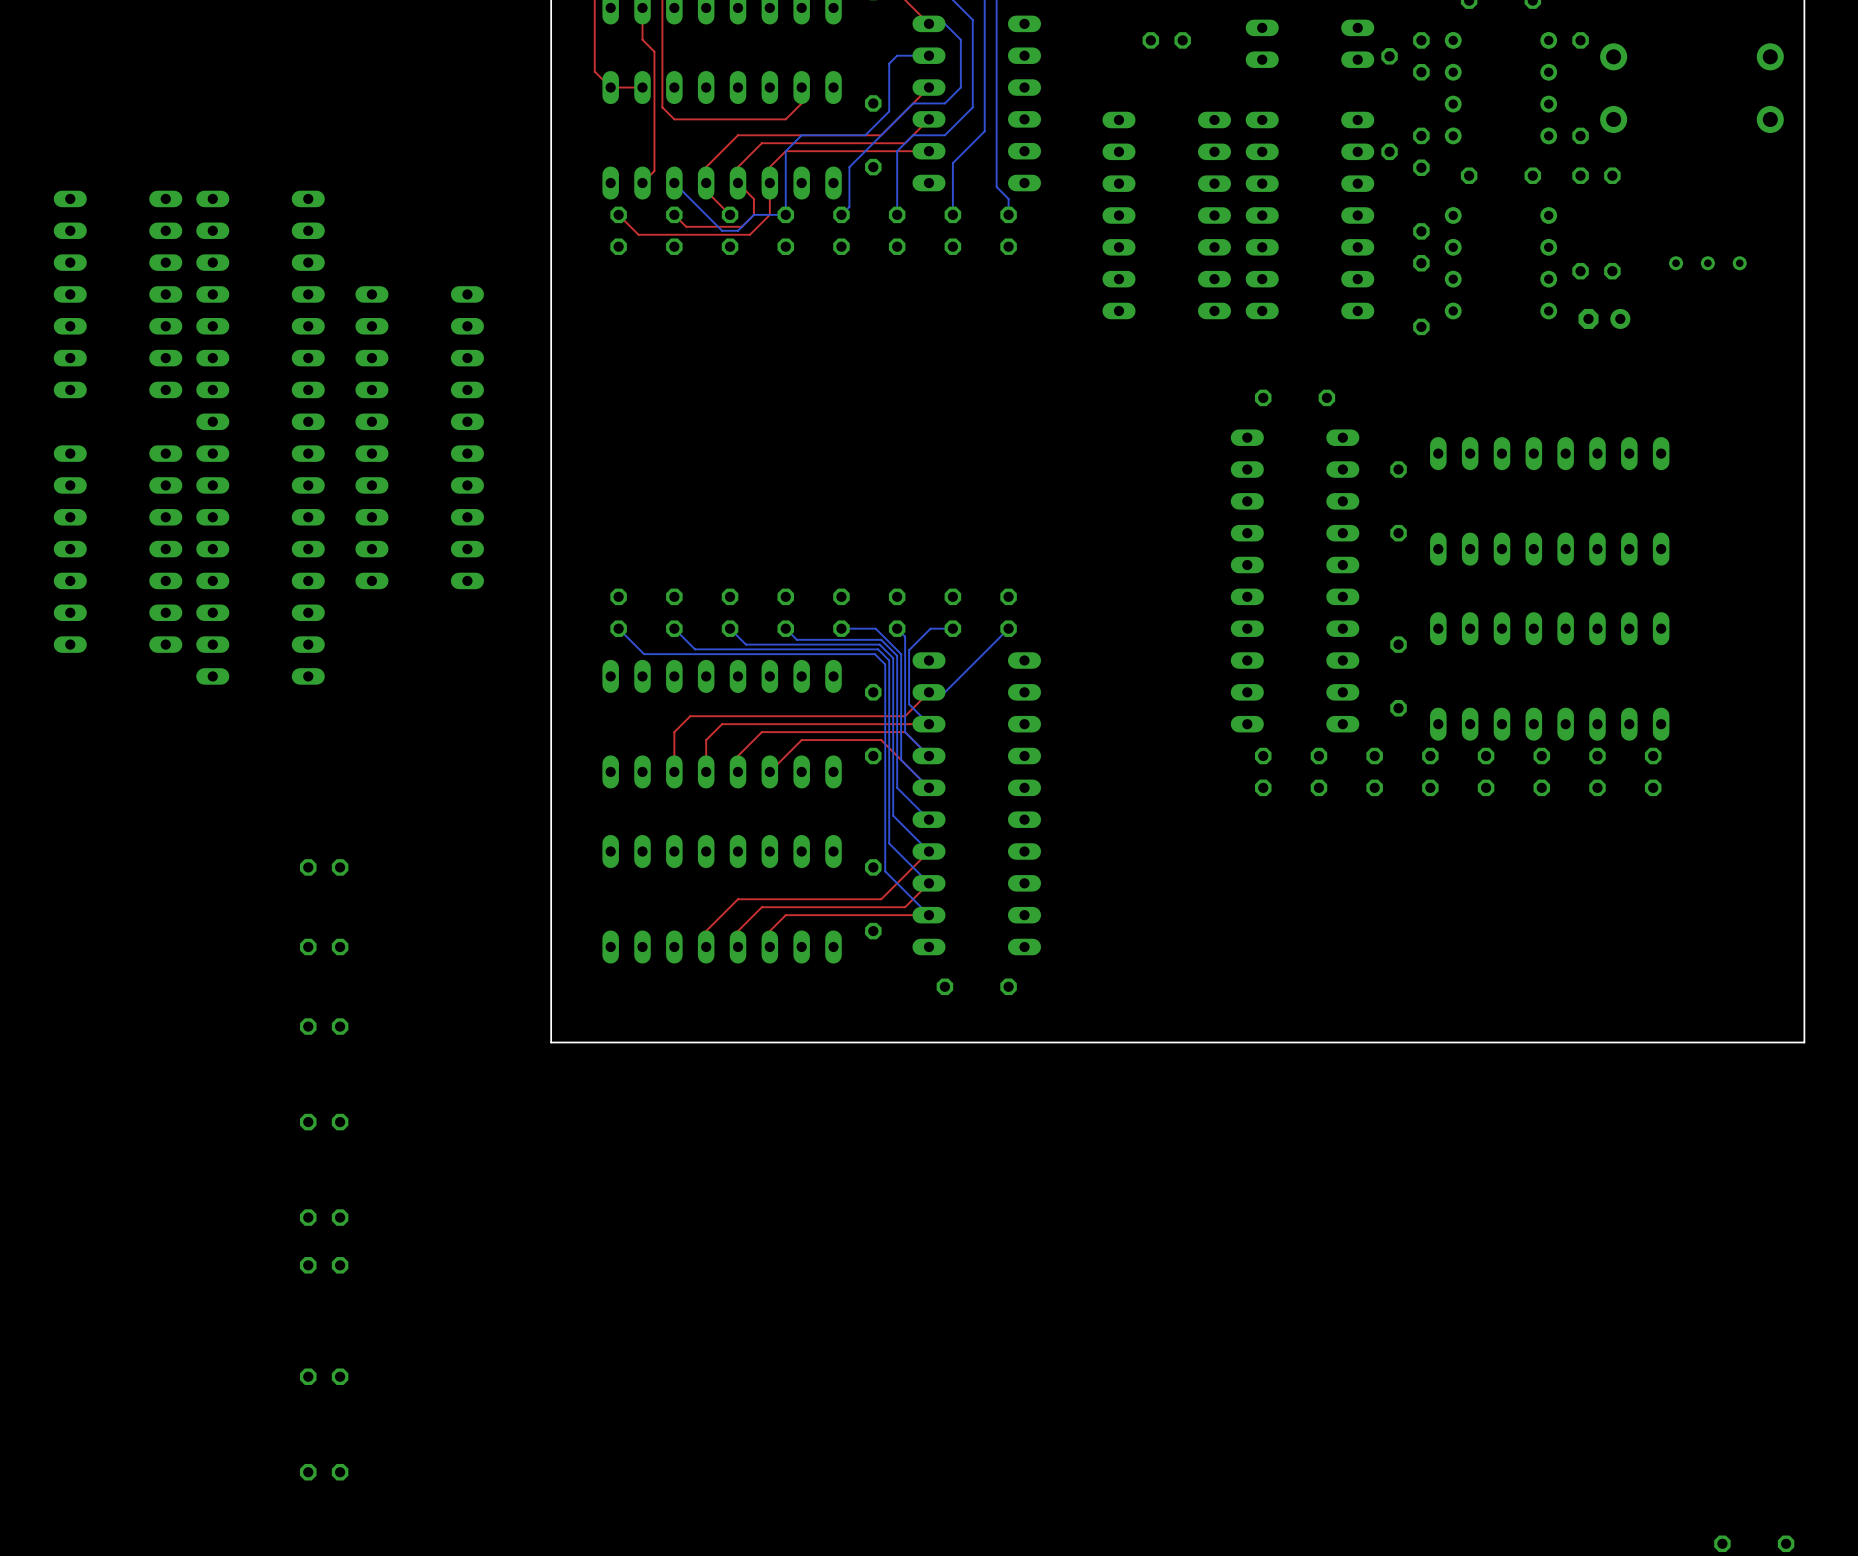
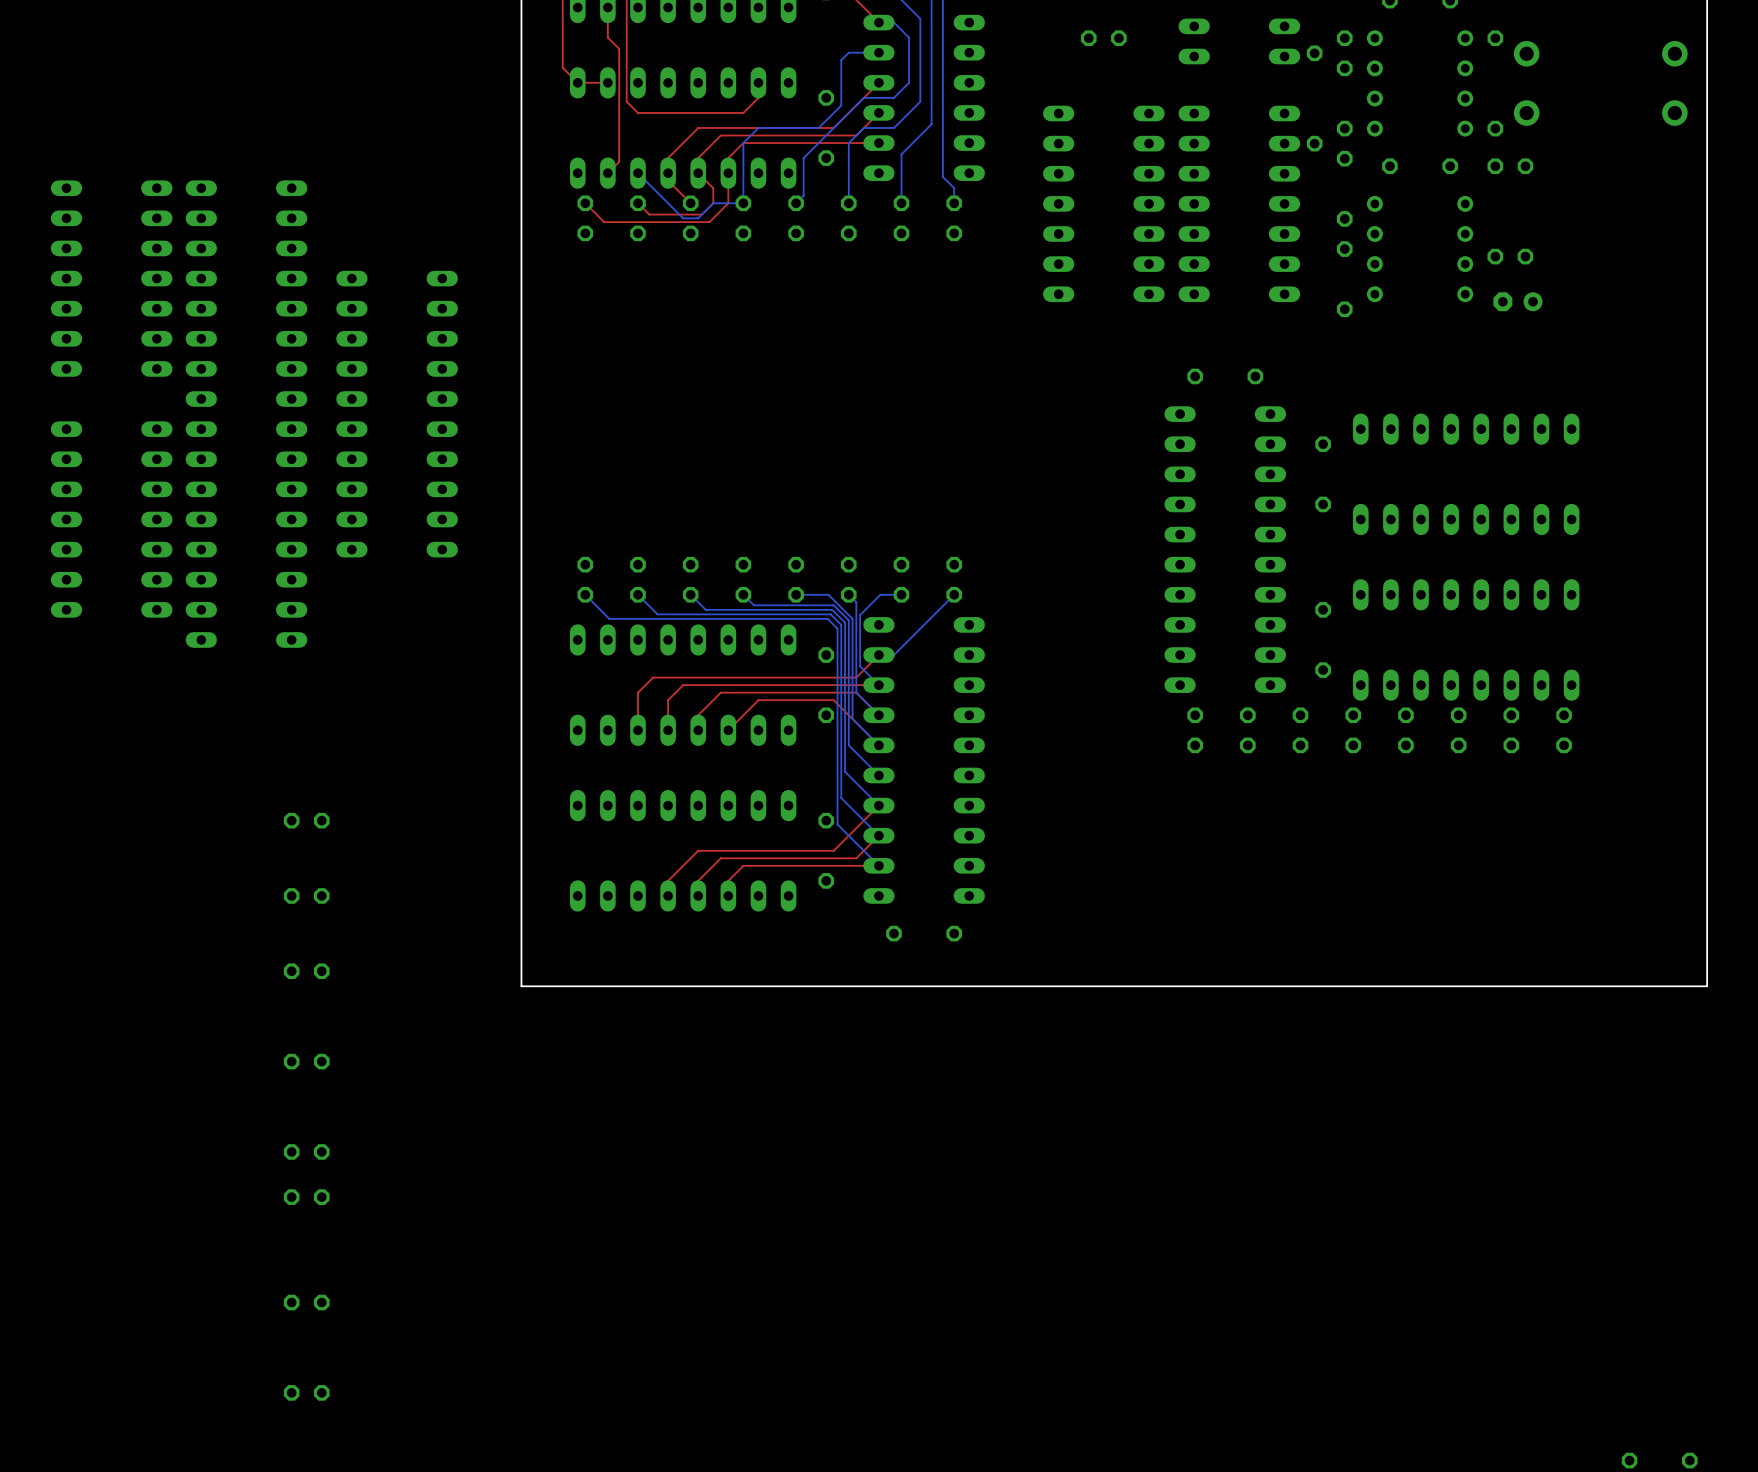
part: (1707, 263) -> none

